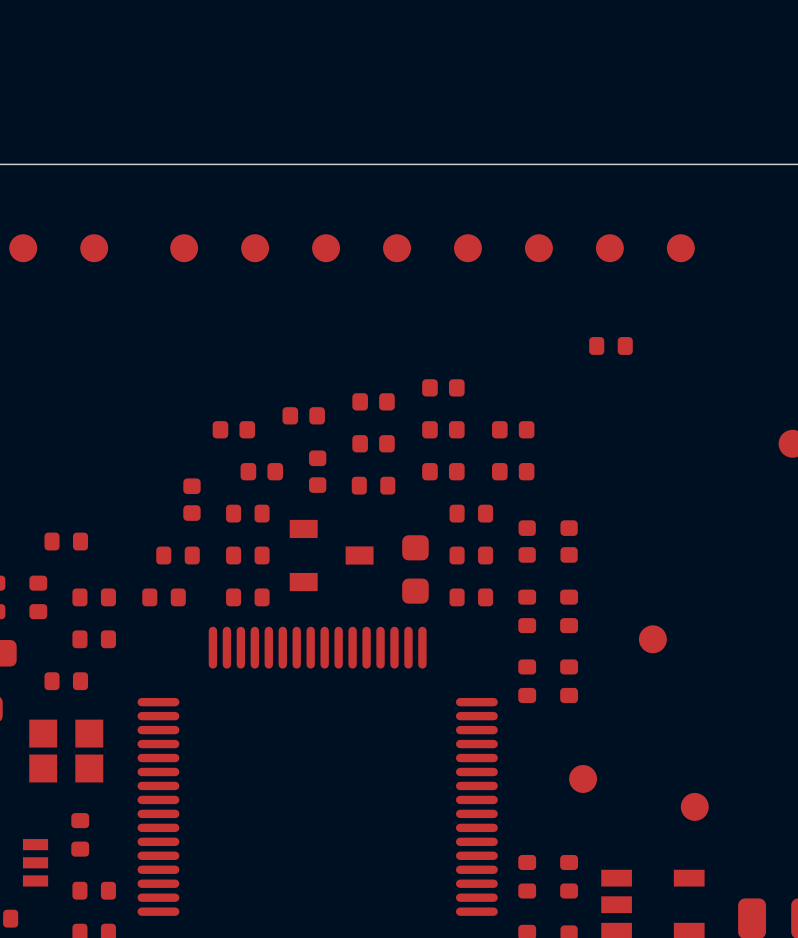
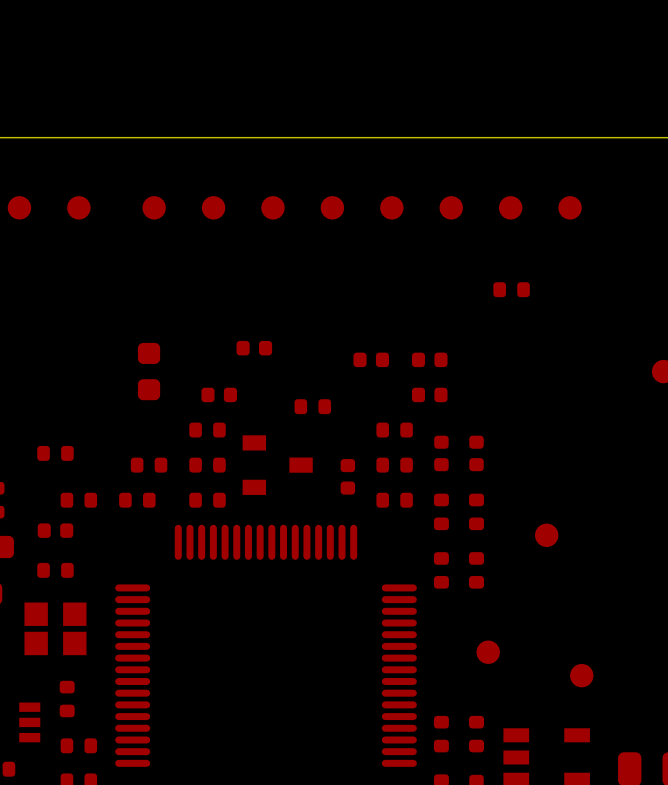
part: (443, 387) -> none
part: (373, 401) -> none
part: (233, 429) -> none
part: none -> (149, 371)
part: (373, 443) -> none
part: (317, 471) -> none
part: (443, 471) -> none
part: (191, 499) -> none
part footprint: [402, 535, 429, 604] -> [340, 459, 356, 495]
part: (38, 597) -> none
part: none -> (55, 530)
part: (94, 639) -> none

